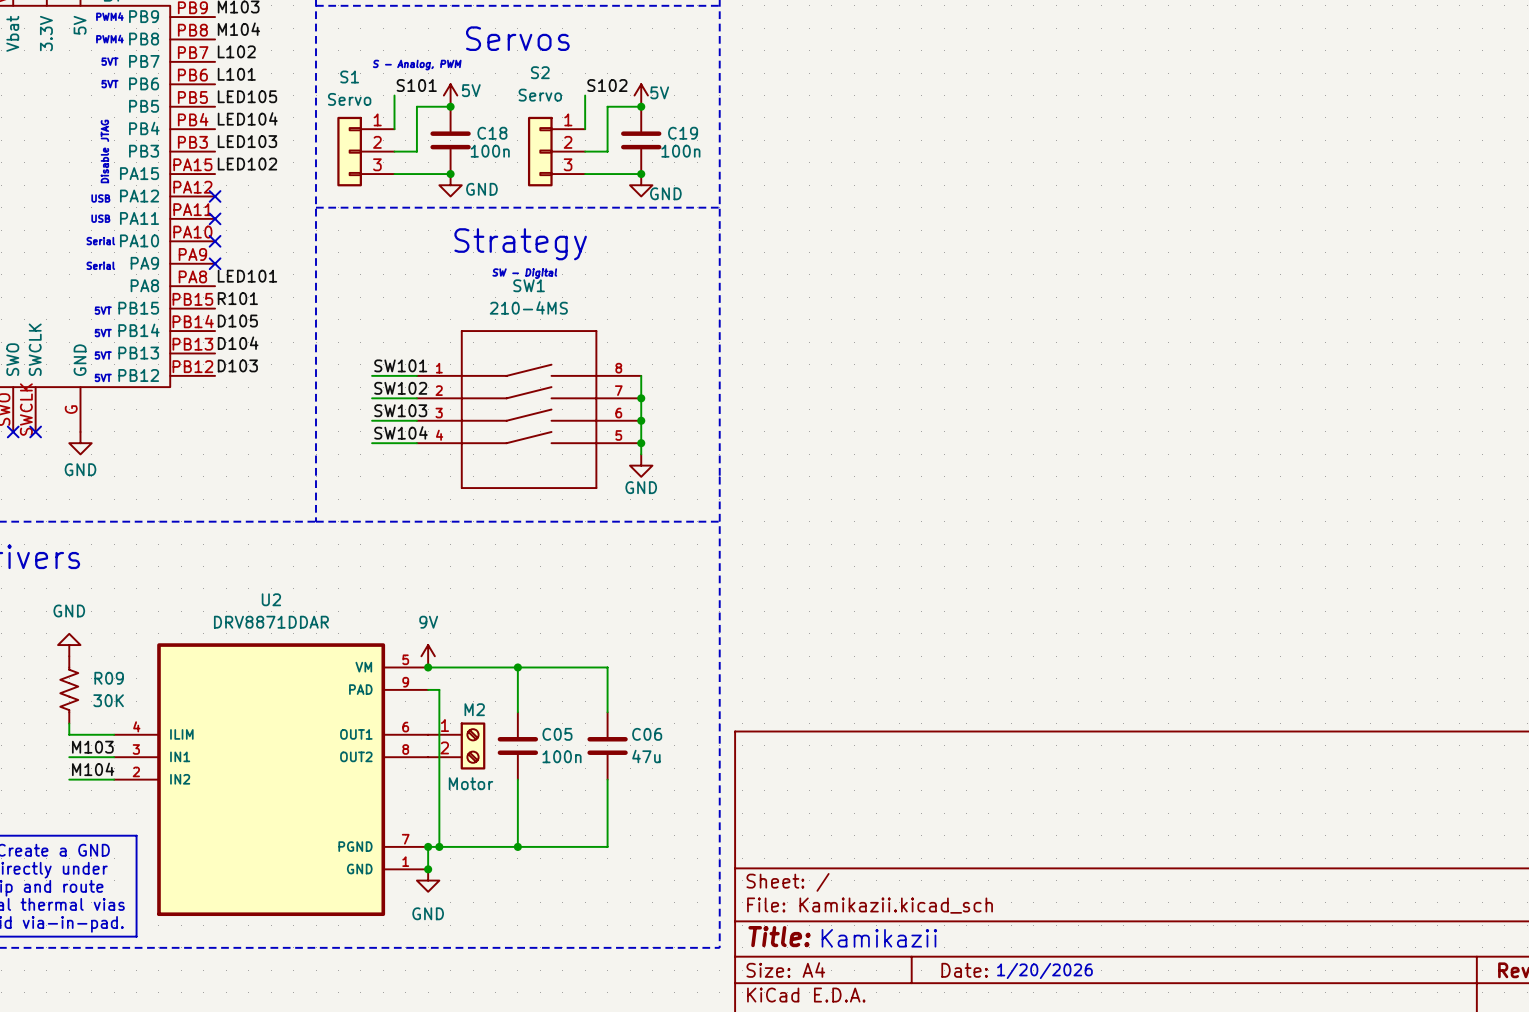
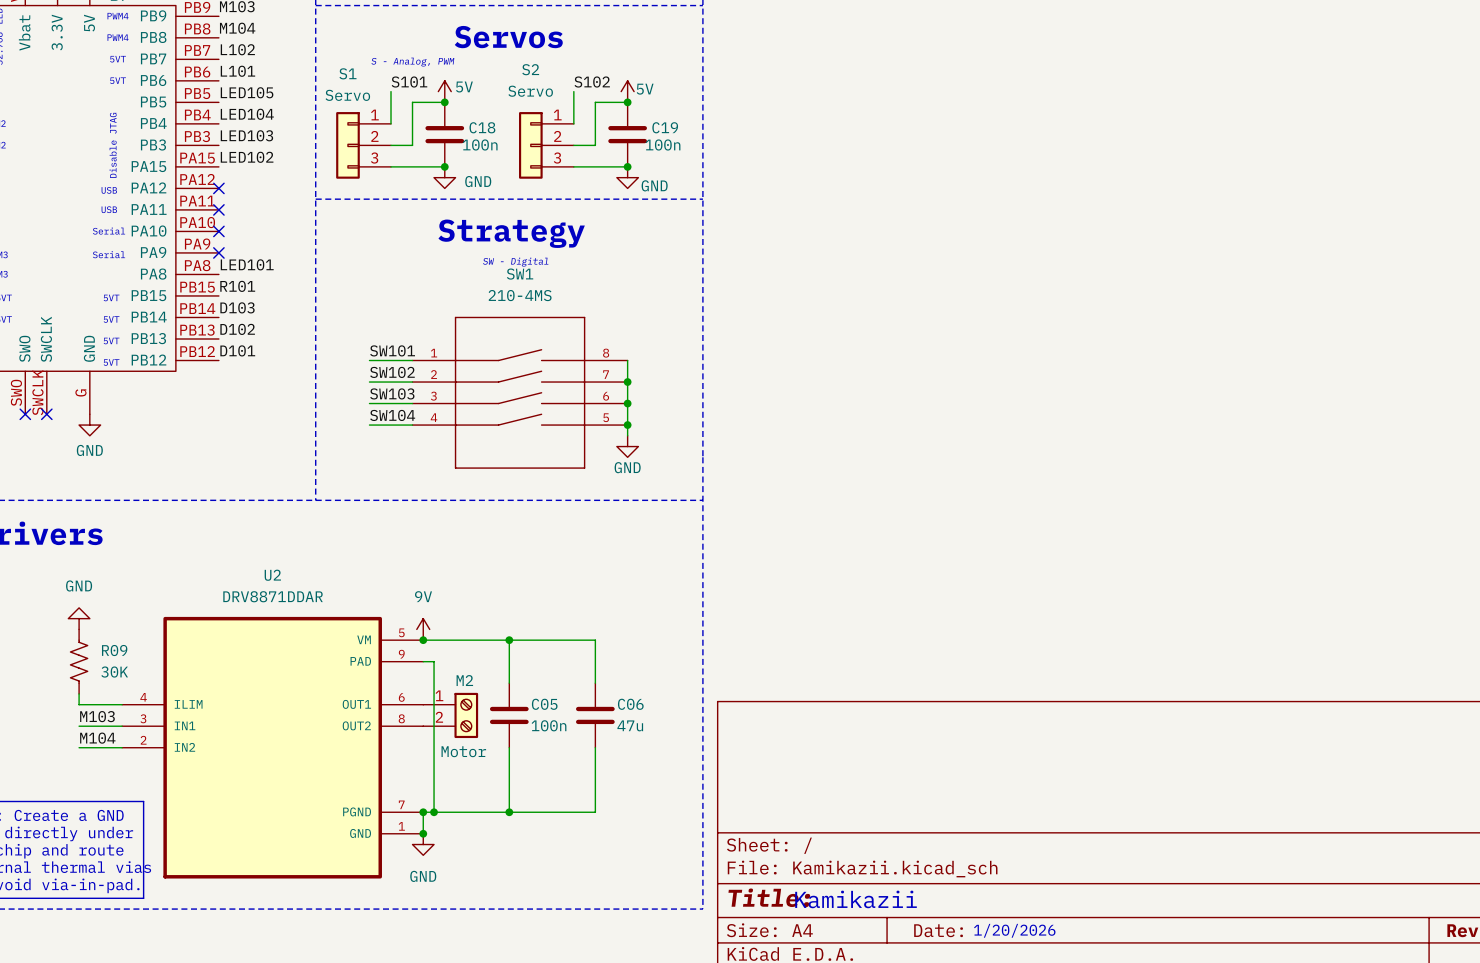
label: D105 (237, 321) -> D103 (237, 307)
label: D104 (238, 343) -> D102 (237, 329)
label: D103 (237, 365) -> D101 (237, 350)

